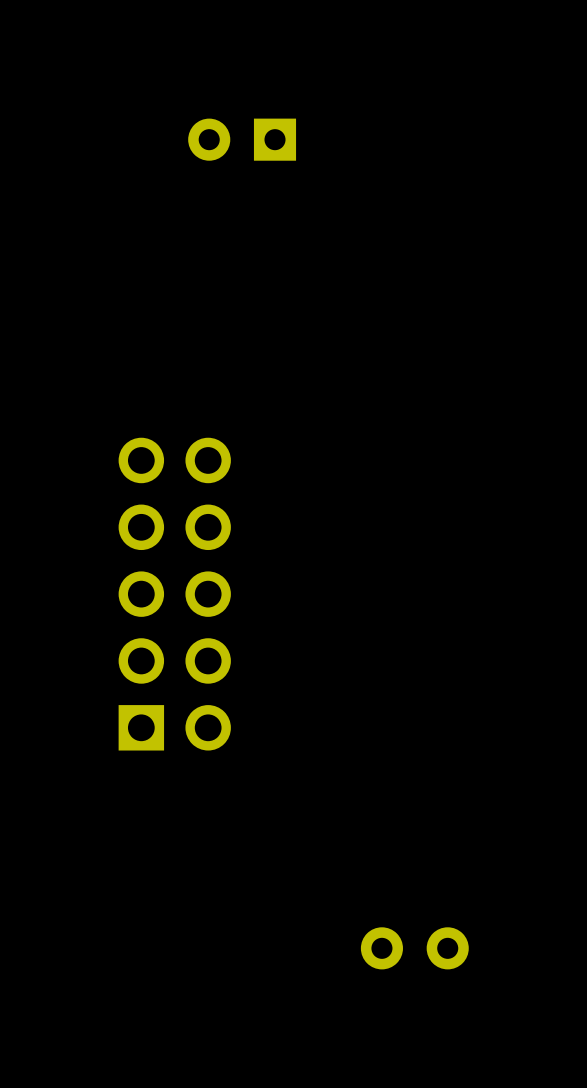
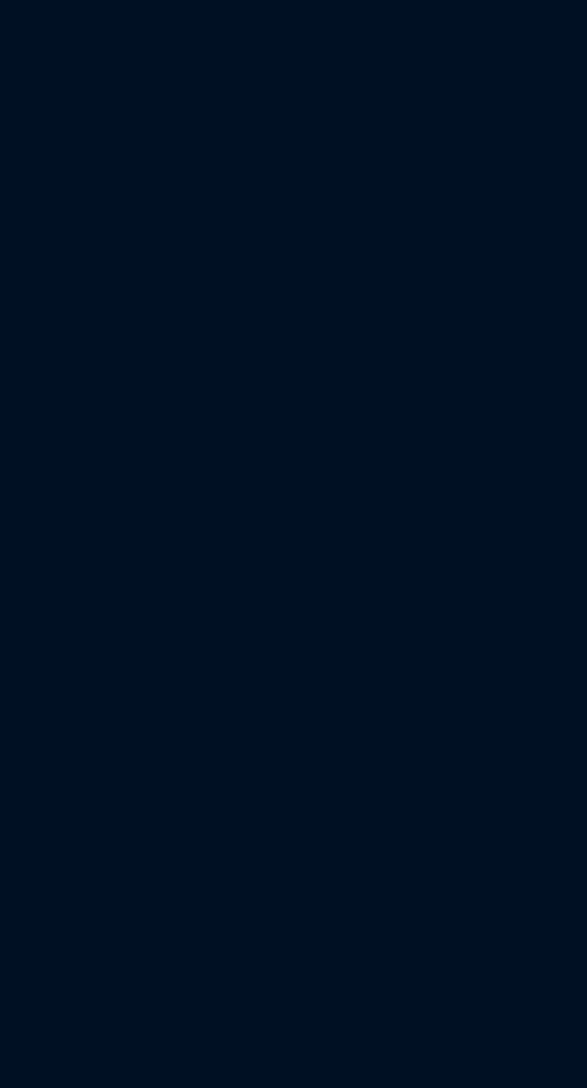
part: (242, 139) -> none
part: (174, 594) -> none
part: (414, 948) -> none

